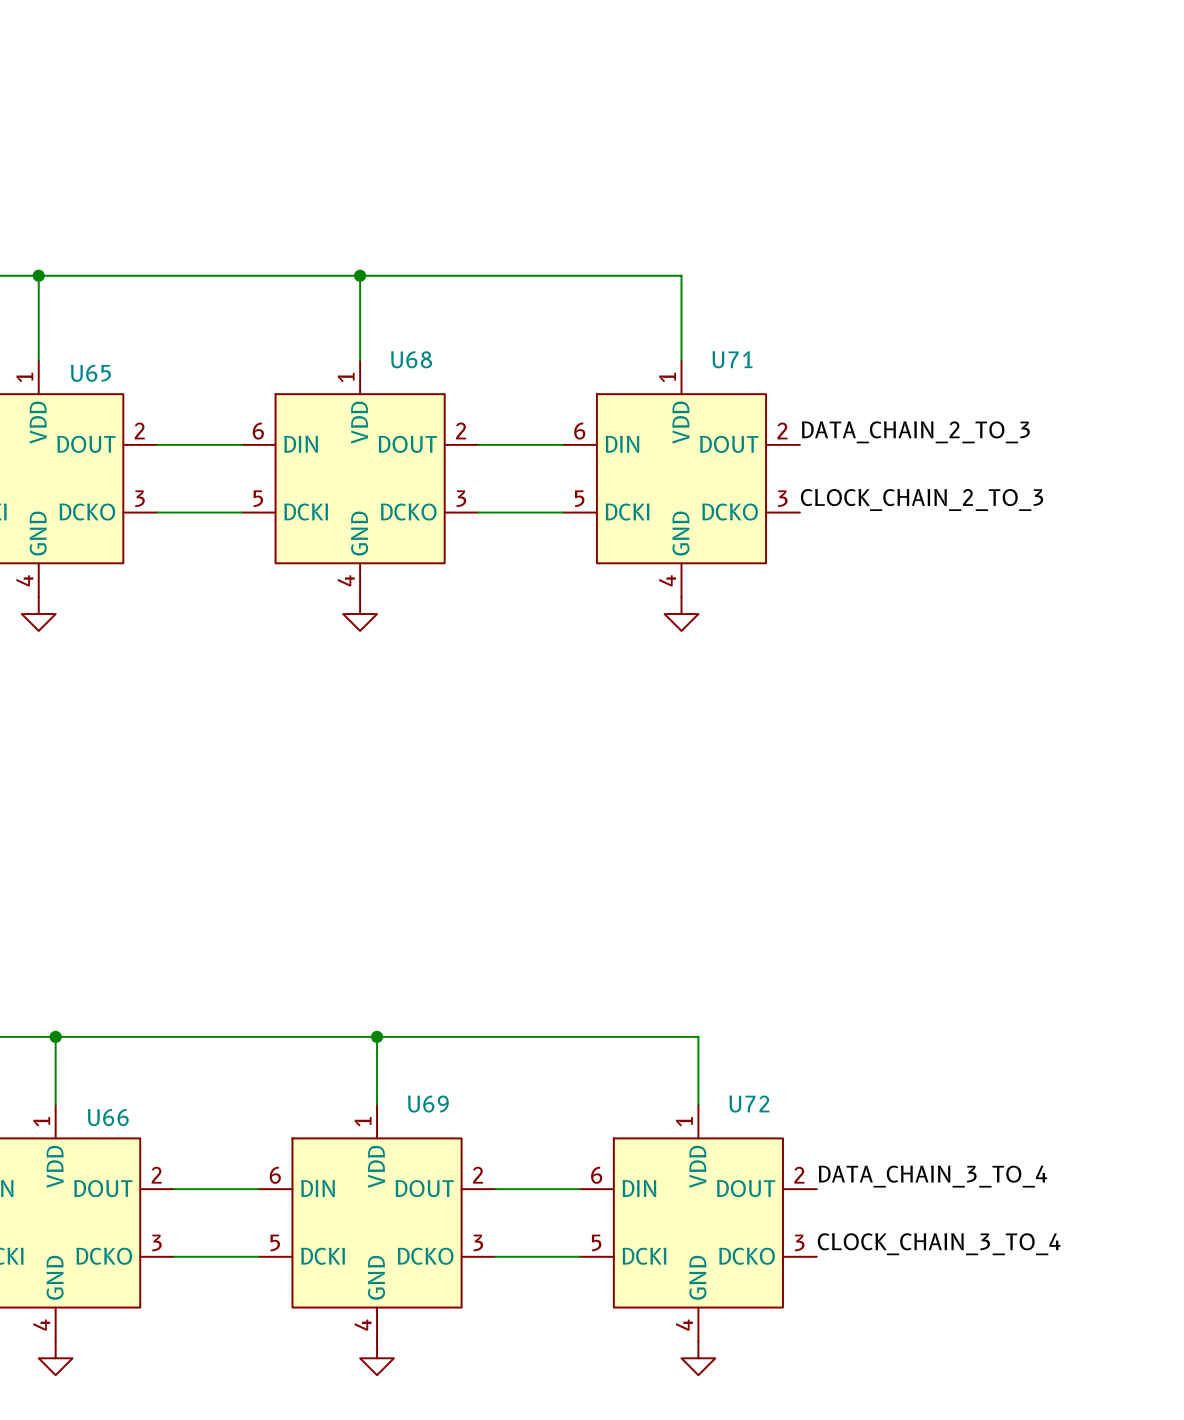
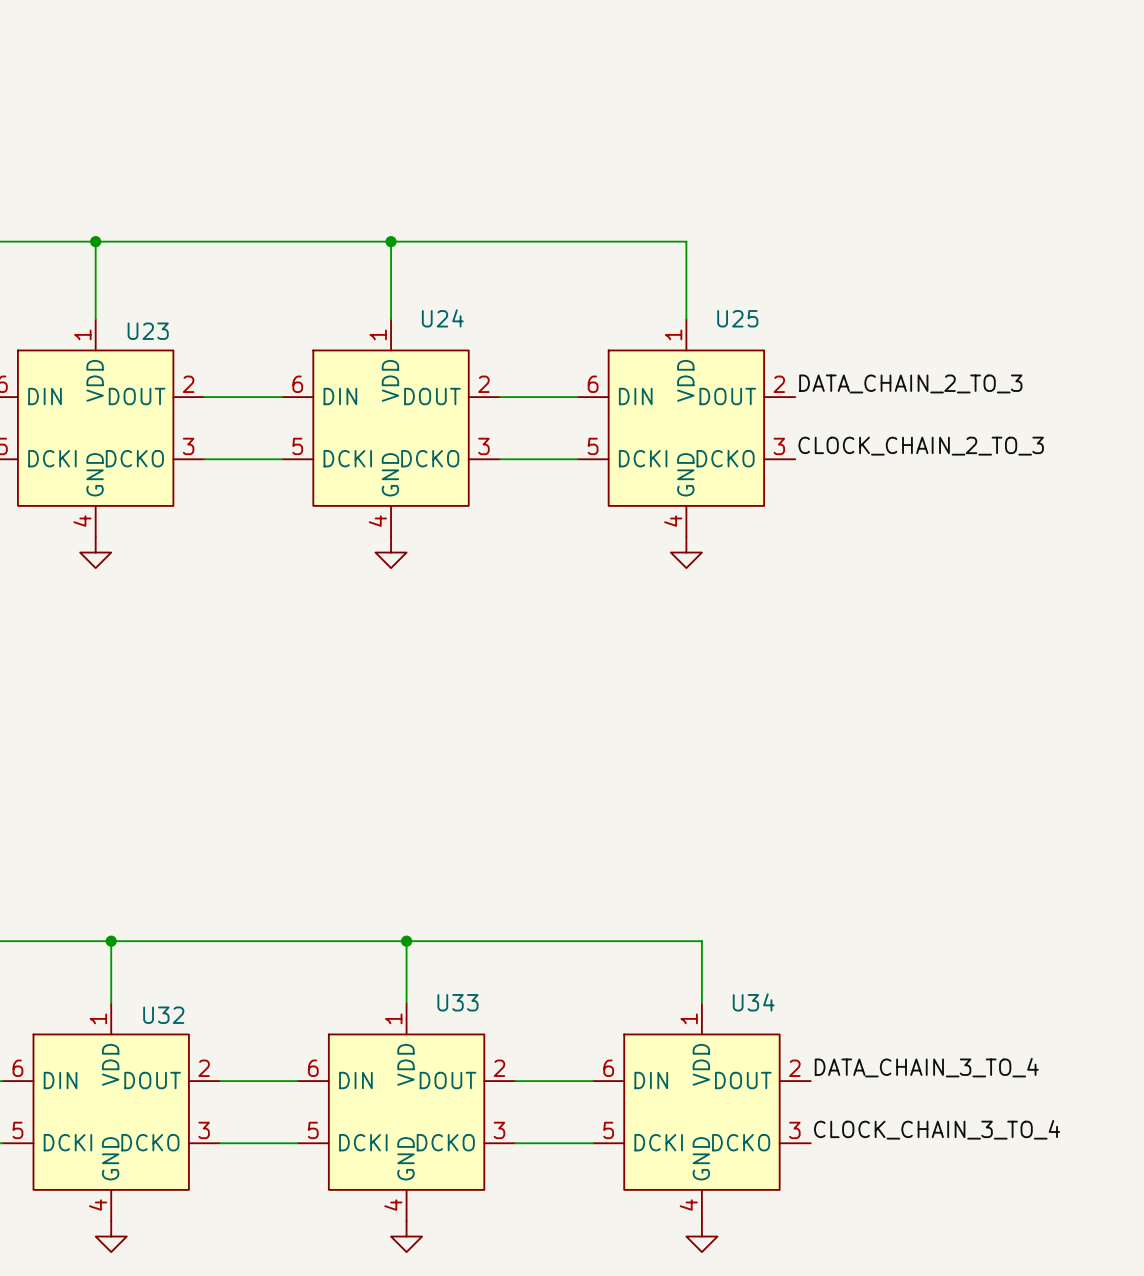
U68 name: U68 (411, 359) -> U24 (442, 318)
U71 name: U71 (732, 359) -> U25 (737, 318)
U65 name: U65 (90, 373) -> U23 (148, 331)
U69 name: U69 (428, 1104) -> U33 (457, 1002)
U72 name: U72 (749, 1104) -> U34 (753, 1002)
U66 name: U66 (108, 1117) -> U32 (163, 1015)

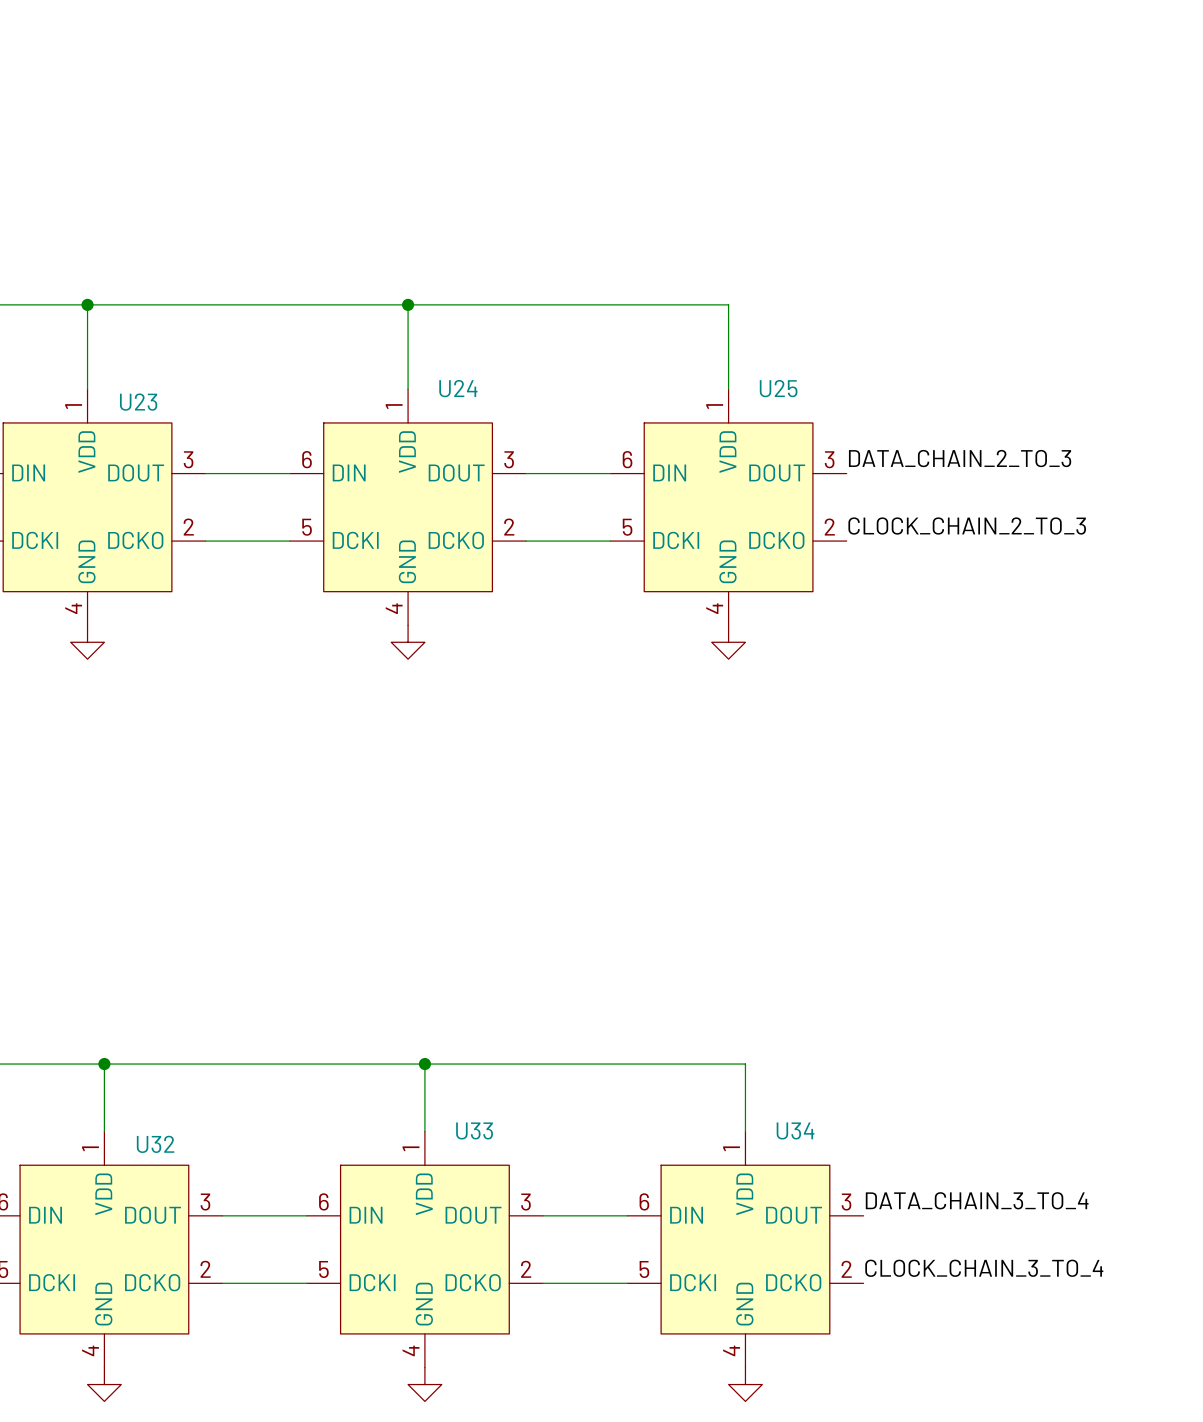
U23 pin number: 2 (188, 384) -> 3 (188, 459)
U24 pin number: 2 (483, 384) -> 3 (509, 459)
U25 pin number: 2 (779, 384) -> 3 (829, 459)
U23 pin number: 3 (188, 446) -> 2 (188, 527)
U24 pin number: 3 (483, 446) -> 2 (509, 527)
U25 pin number: 3 (779, 446) -> 2 (829, 527)
U32 pin number: 2 (204, 1068) -> 3 (205, 1202)
U33 pin number: 2 (499, 1068) -> 3 (525, 1202)
U34 pin number: 2 (794, 1068) -> 3 (846, 1202)
U32 pin number: 3 (204, 1130) -> 2 (205, 1269)
U33 pin number: 3 (499, 1130) -> 2 (526, 1269)
U34 pin number: 3 (794, 1130) -> 2 (846, 1269)

